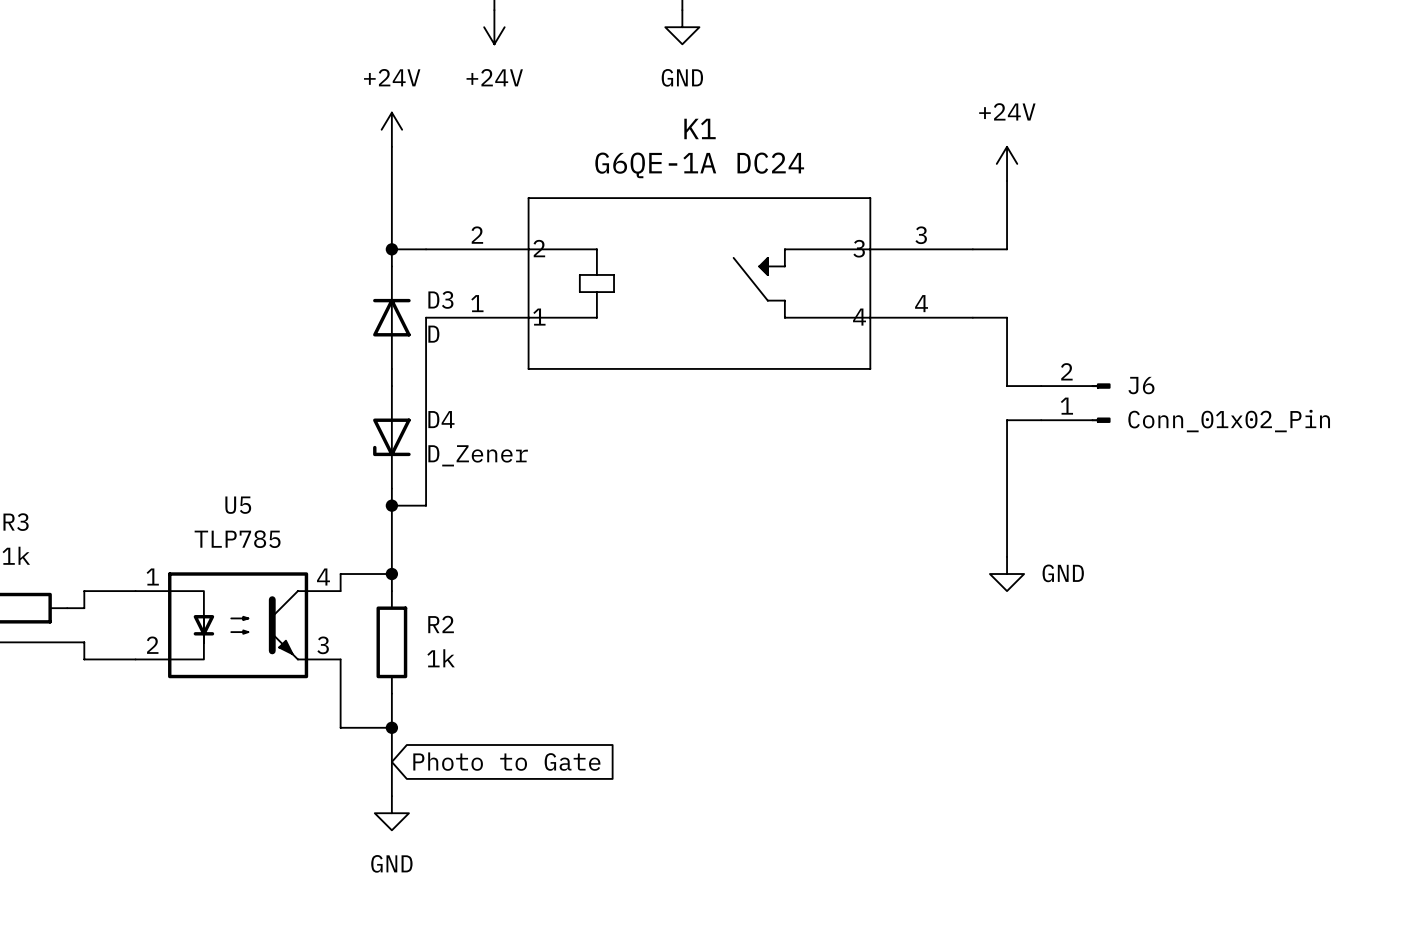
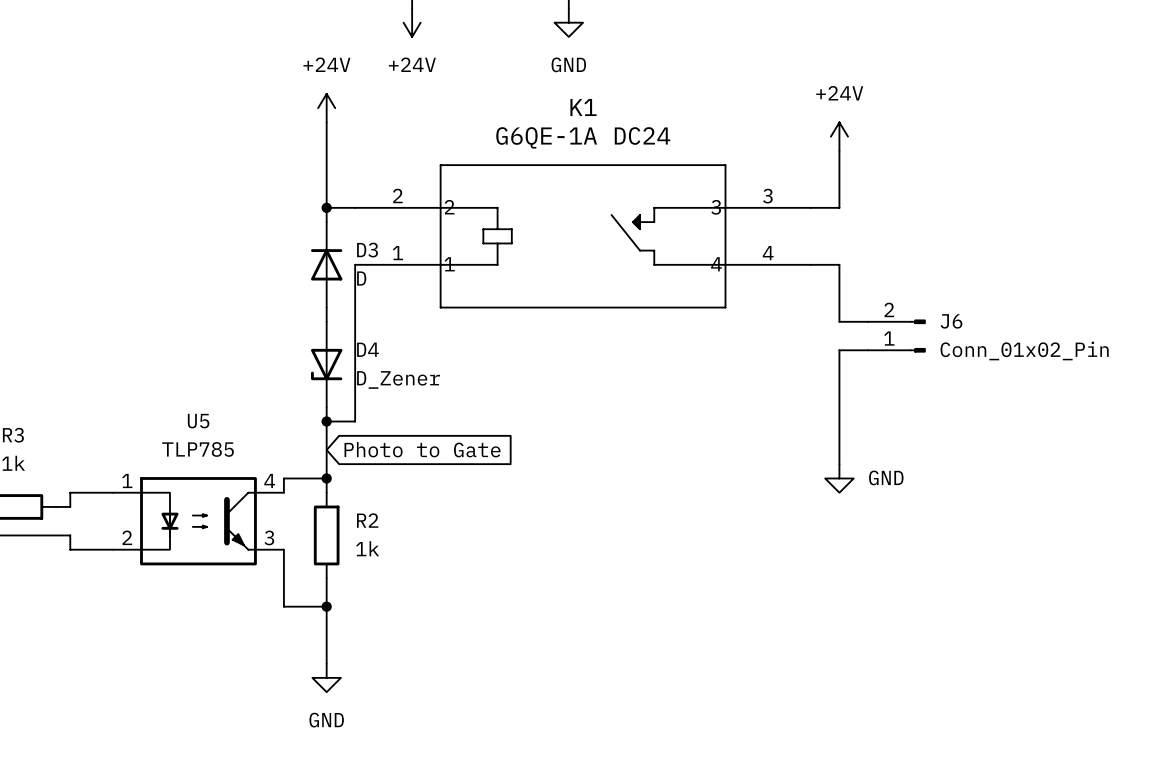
global label position: Photo to Gate (506, 761) -> Photo to Gate (422, 449)

